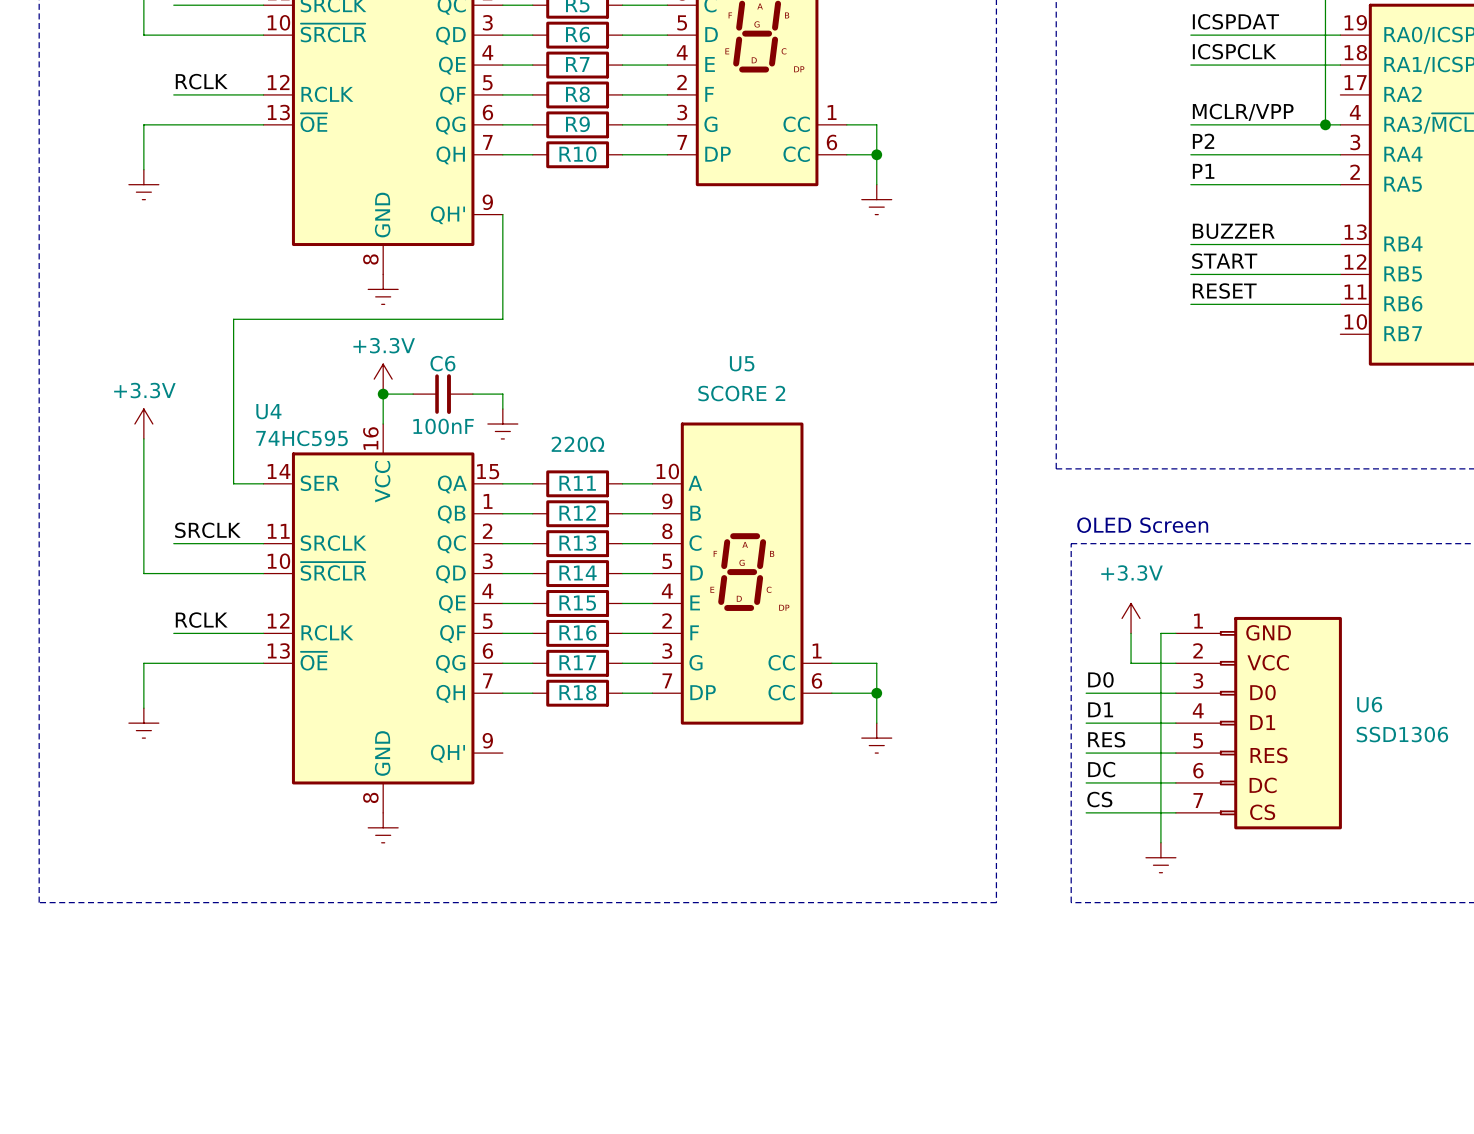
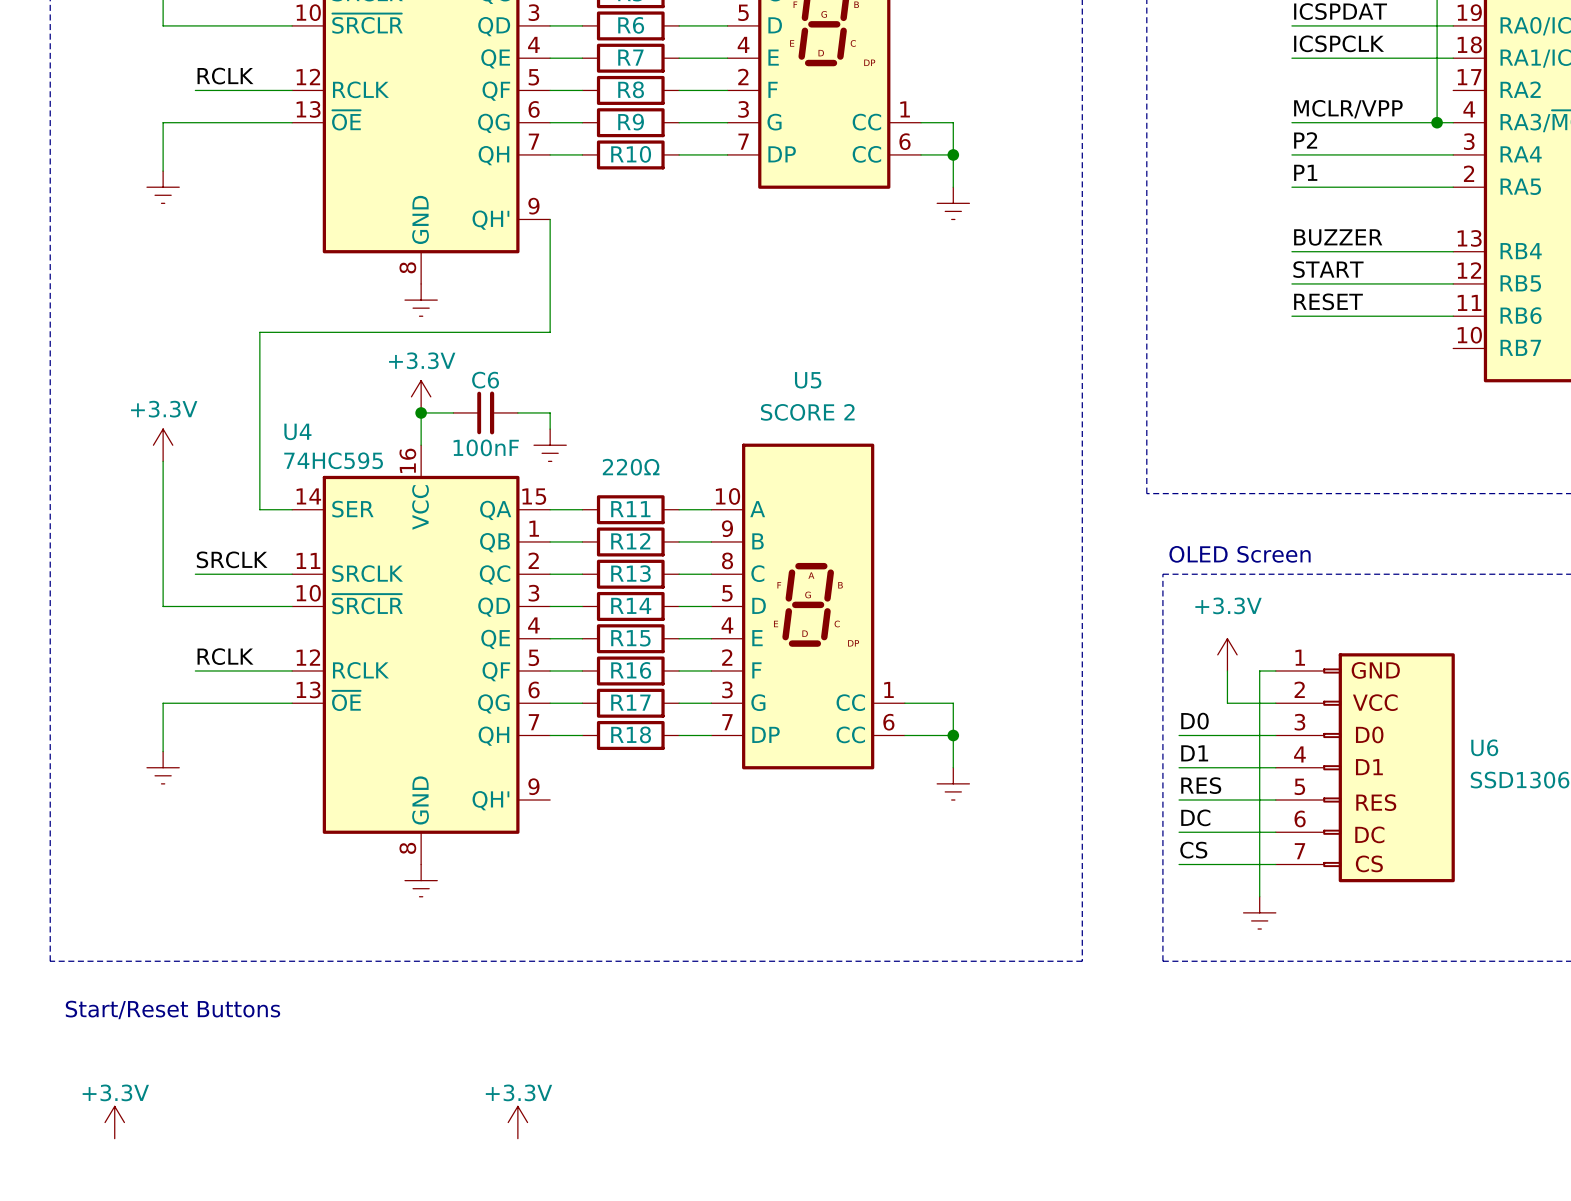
text: none -> Start/Reset Buttons (172, 1009)
power symbol: none -> +3.3V (114, 1122)
power symbol: none -> +3.3V (517, 1122)

